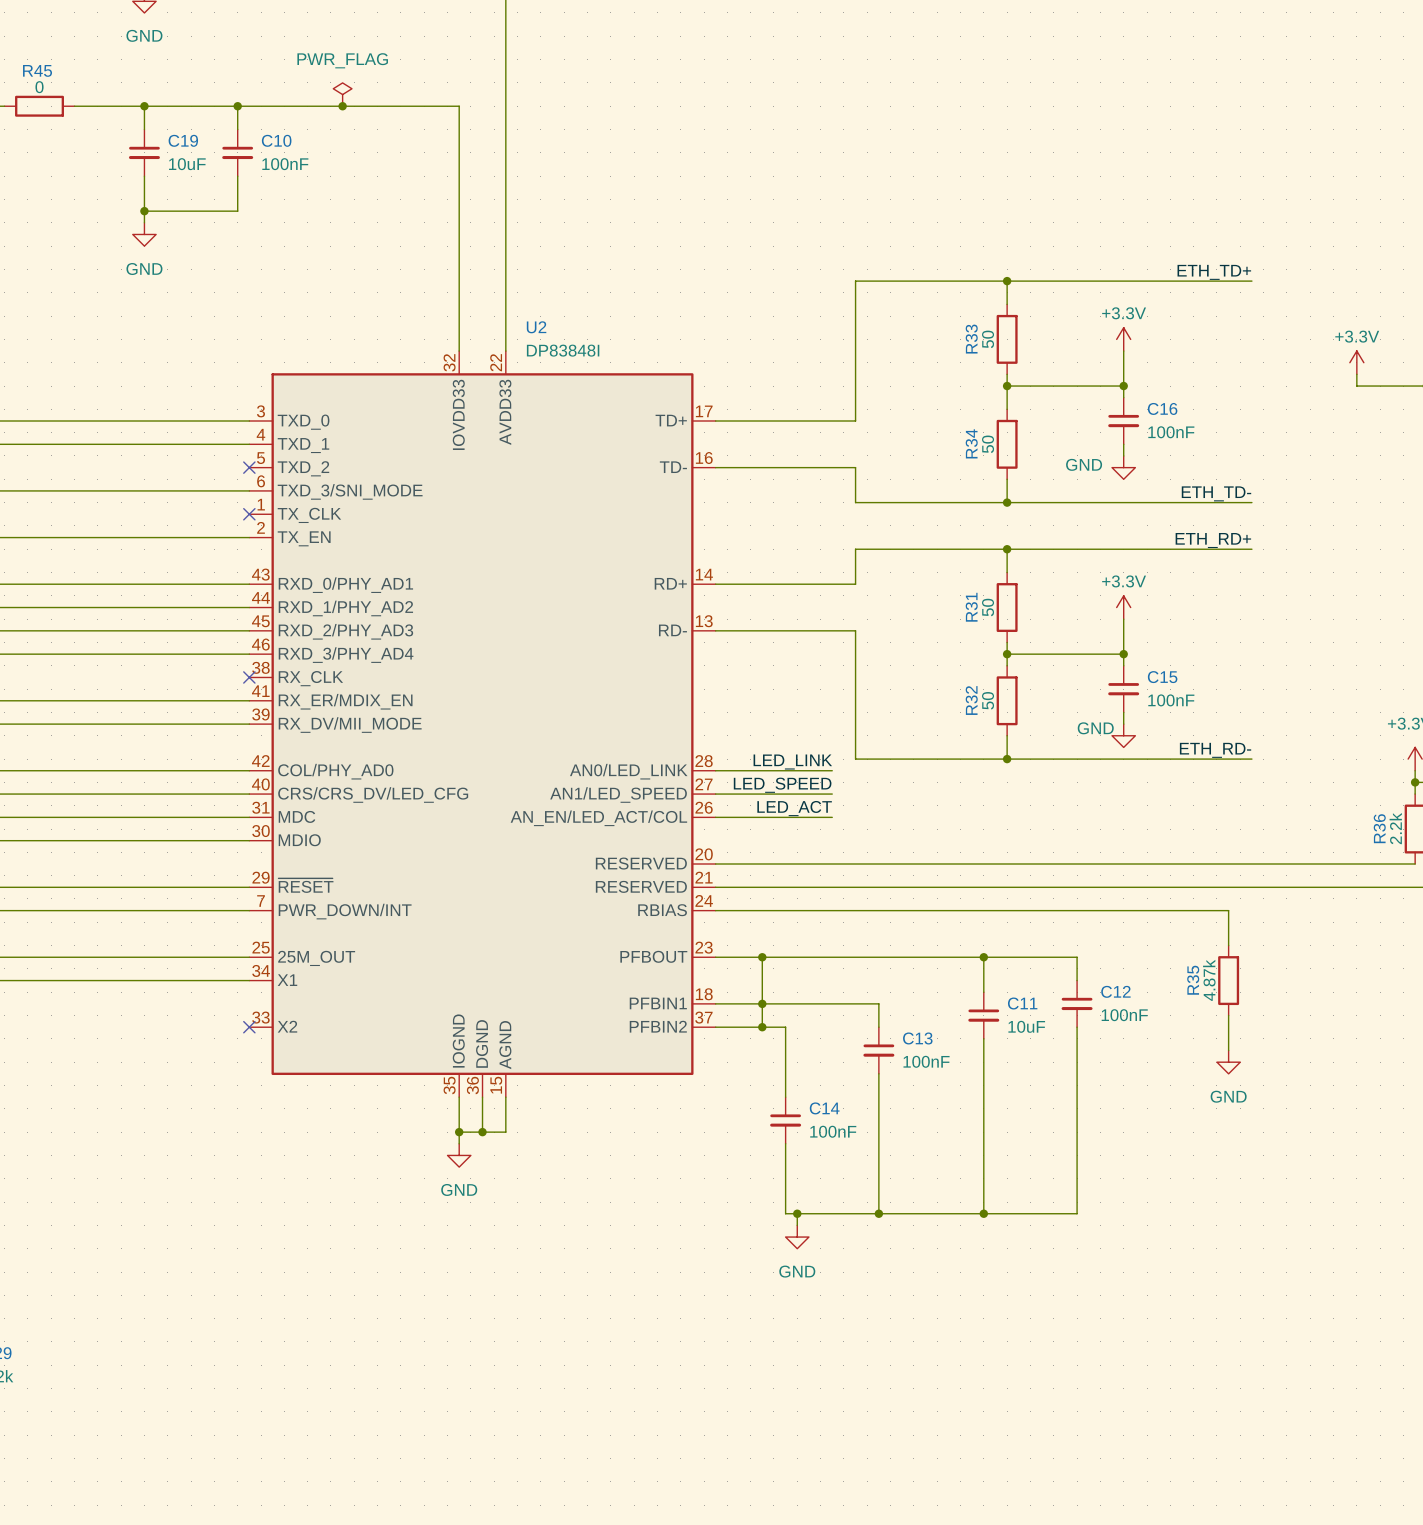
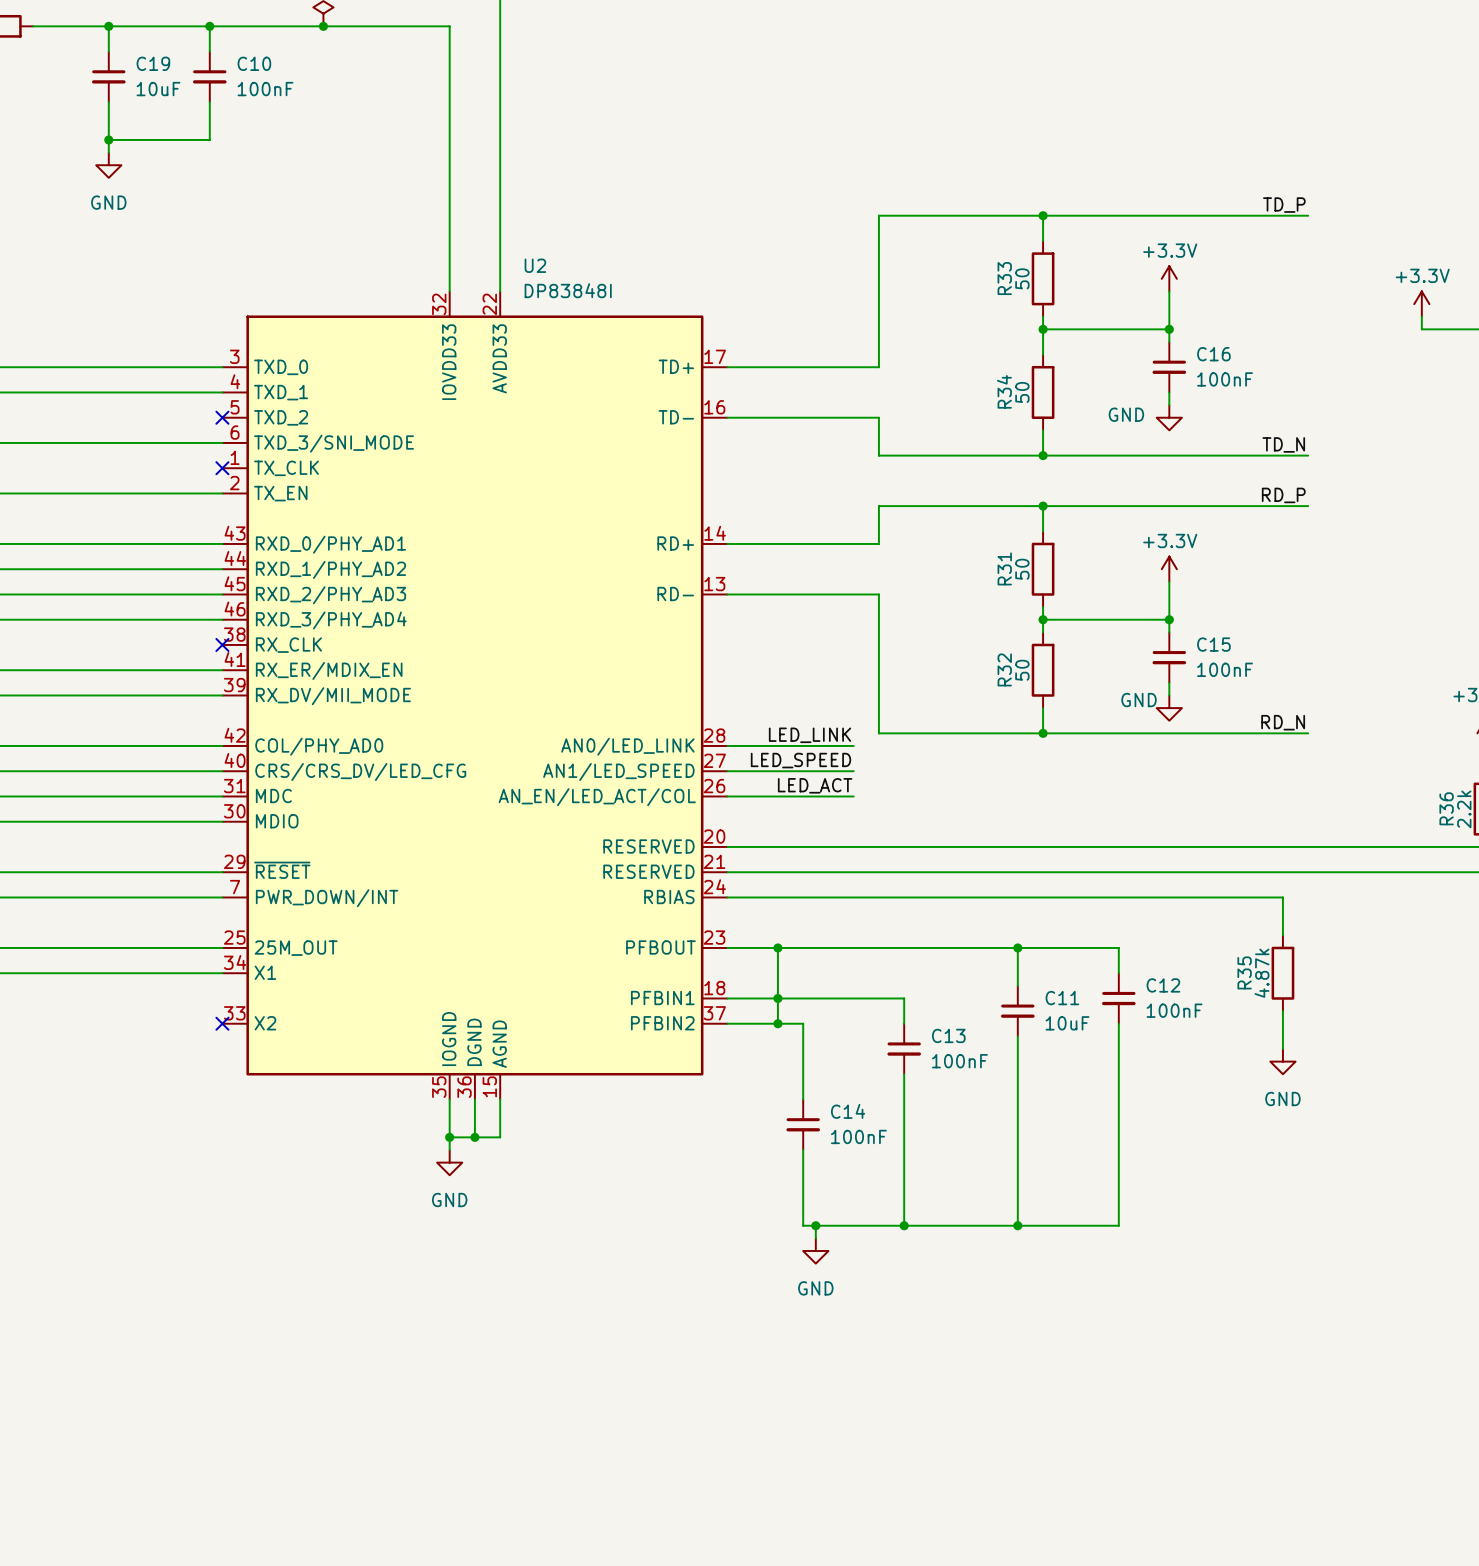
label: ETH_TD+ (1214, 272) -> TD_P (1284, 205)
label: ETH_TD- (1216, 493) -> TD_N (1283, 444)
label: ETH_RD+ (1213, 540) -> RD_P (1283, 495)
label: ETH_RD- (1215, 750) -> RD_N (1283, 722)

